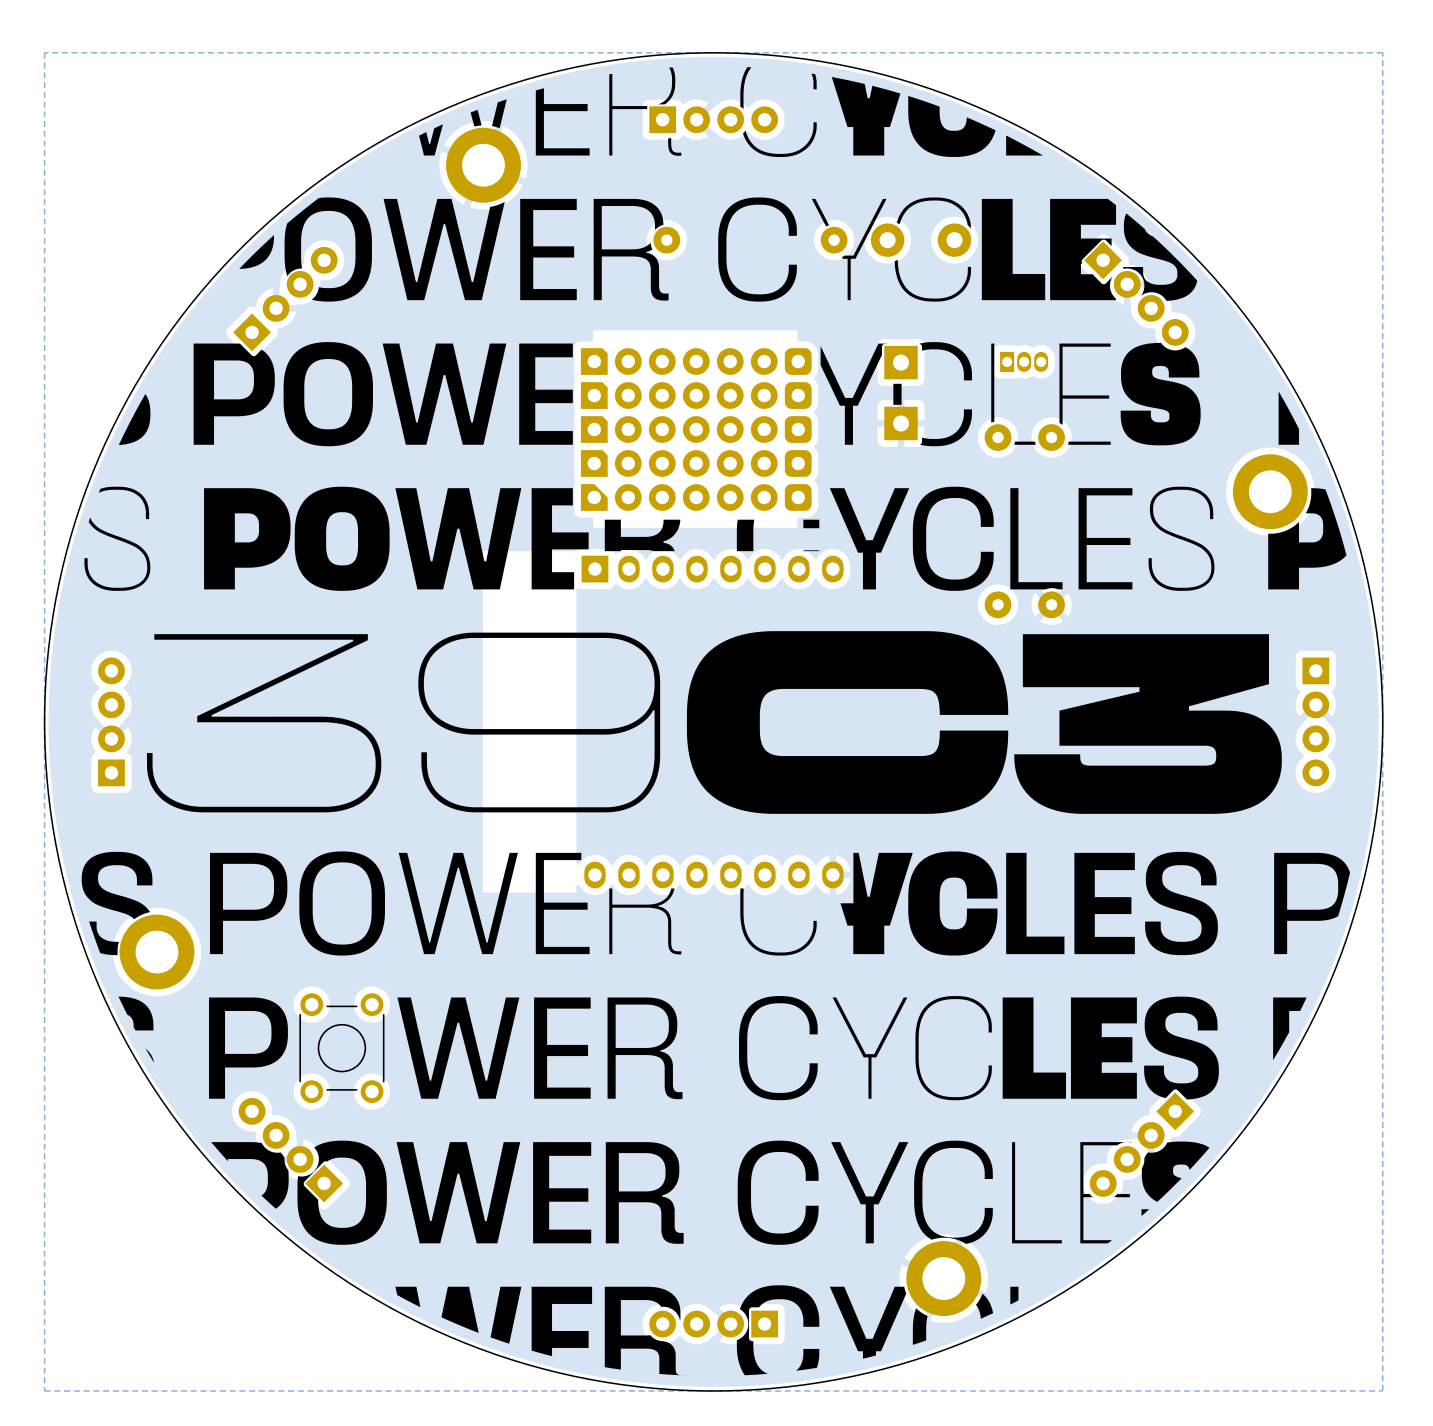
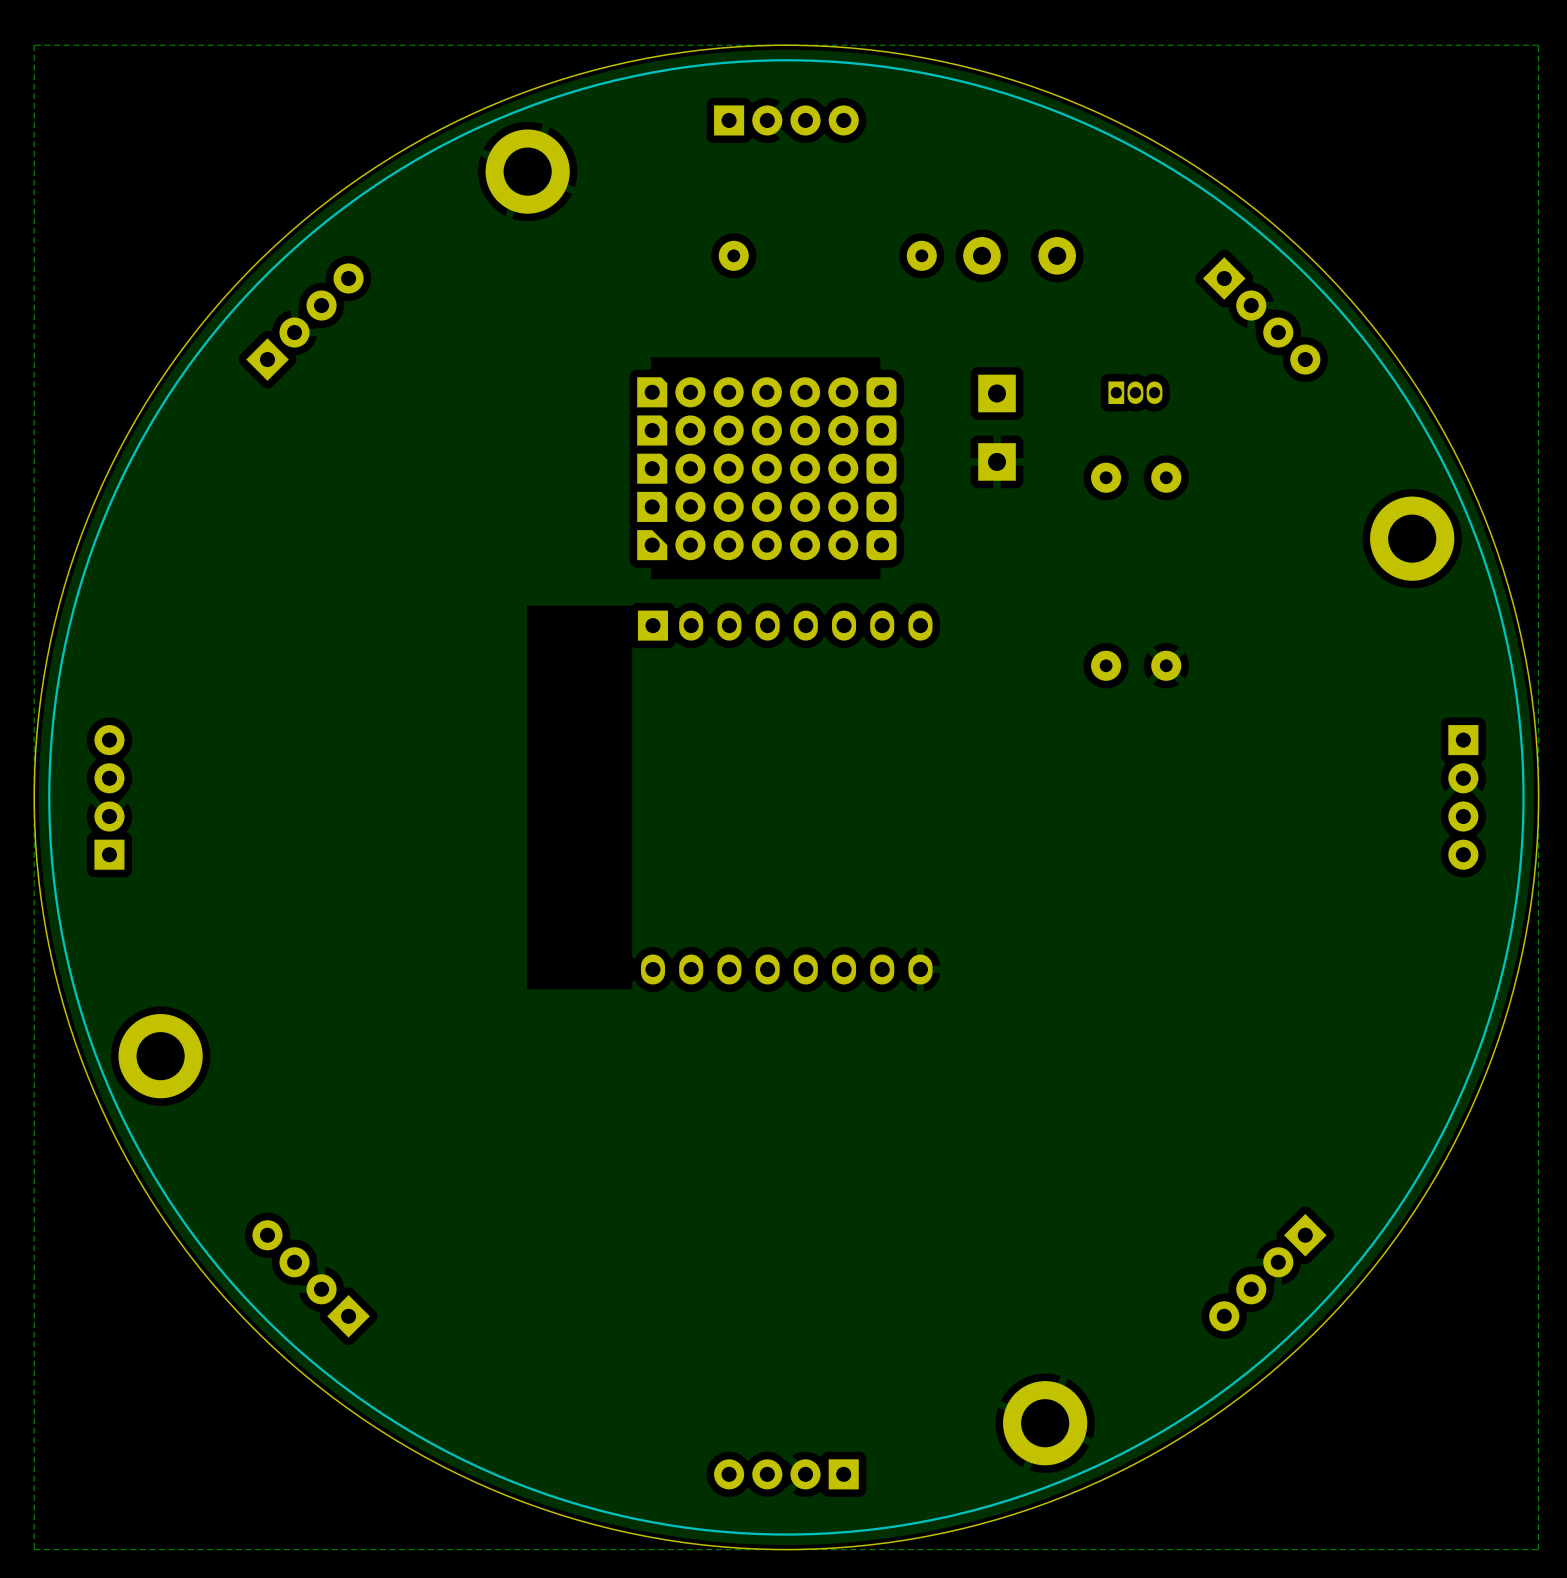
drawing shape: [81, 67, 1351, 1376] -> [48, 59, 1525, 1536]
part: (341, 1048) -> none

